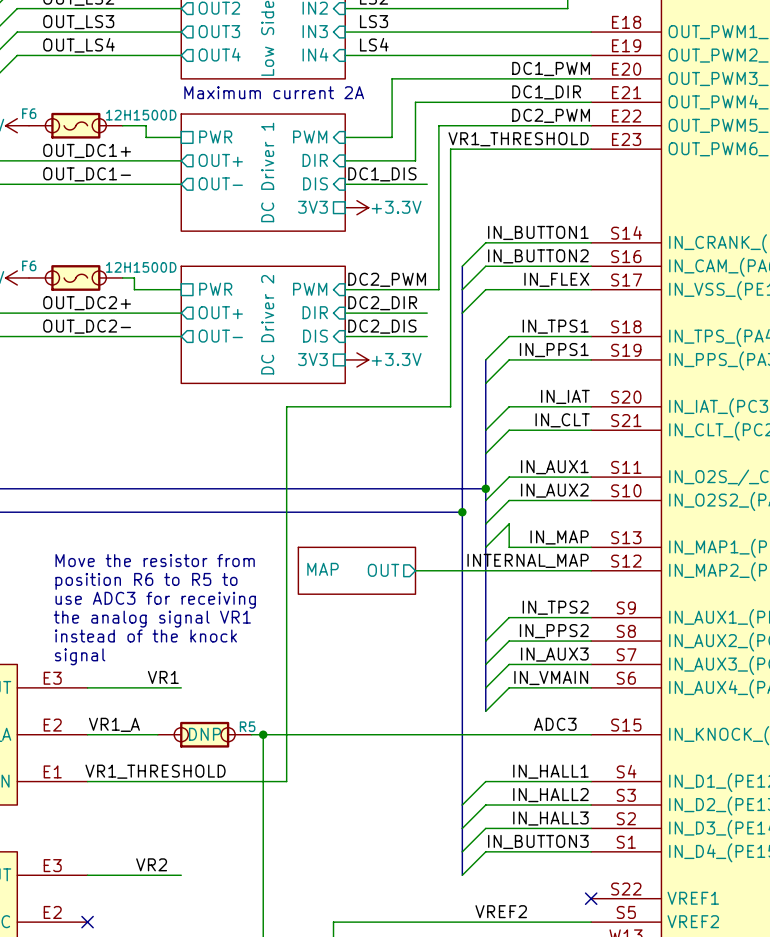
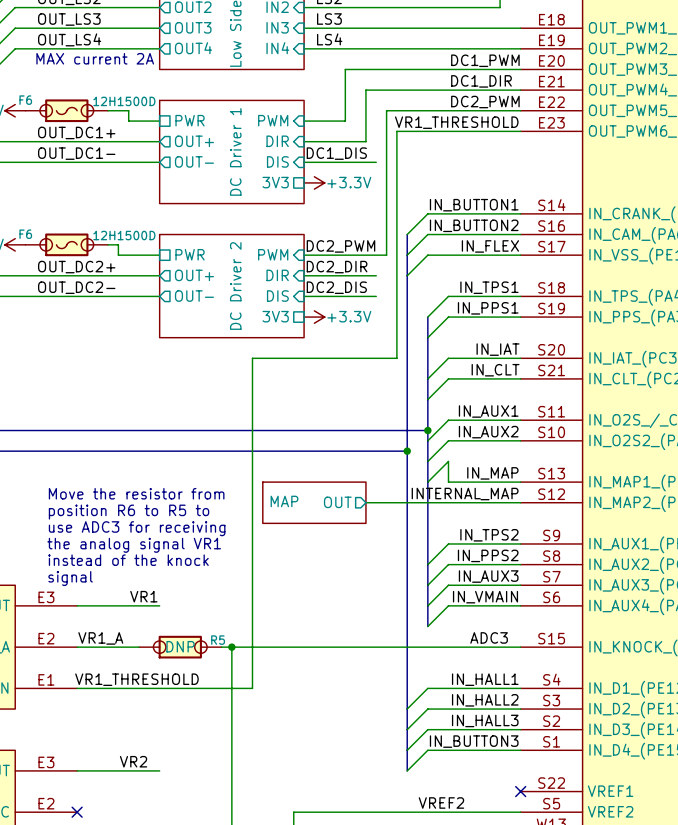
text: none -> MAX current 2A (95, 58)
text: Maximum current 2A (274, 92) -> none

